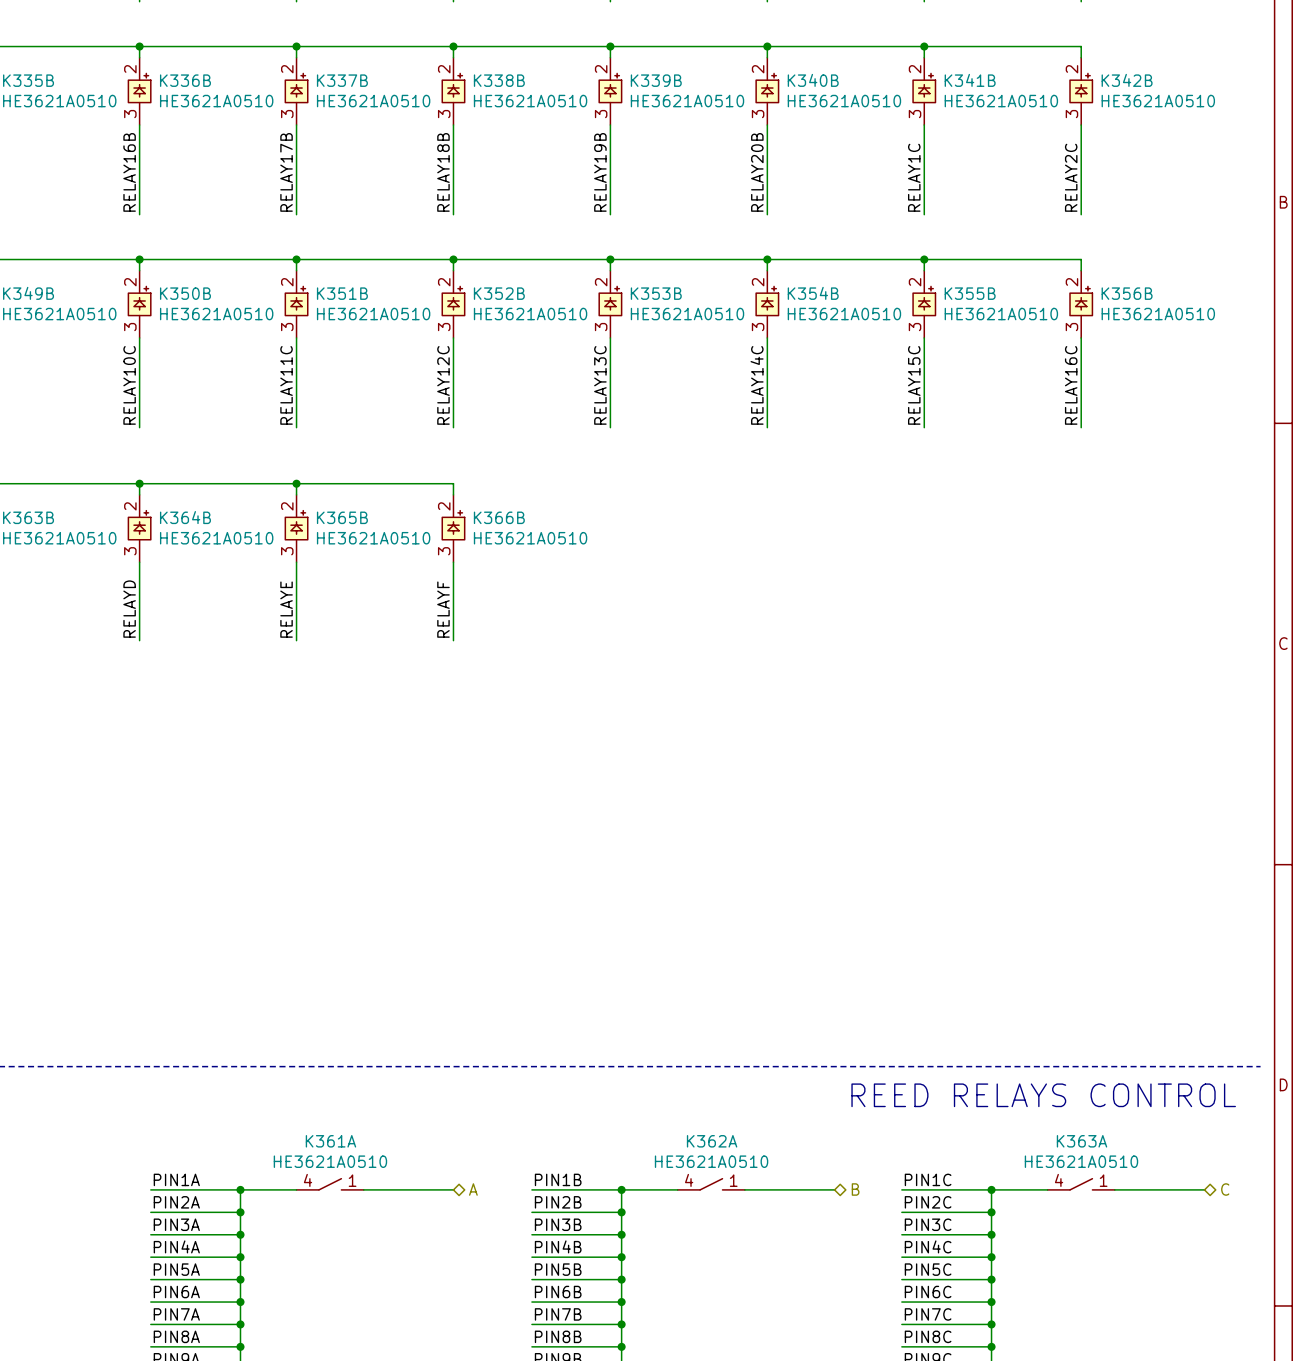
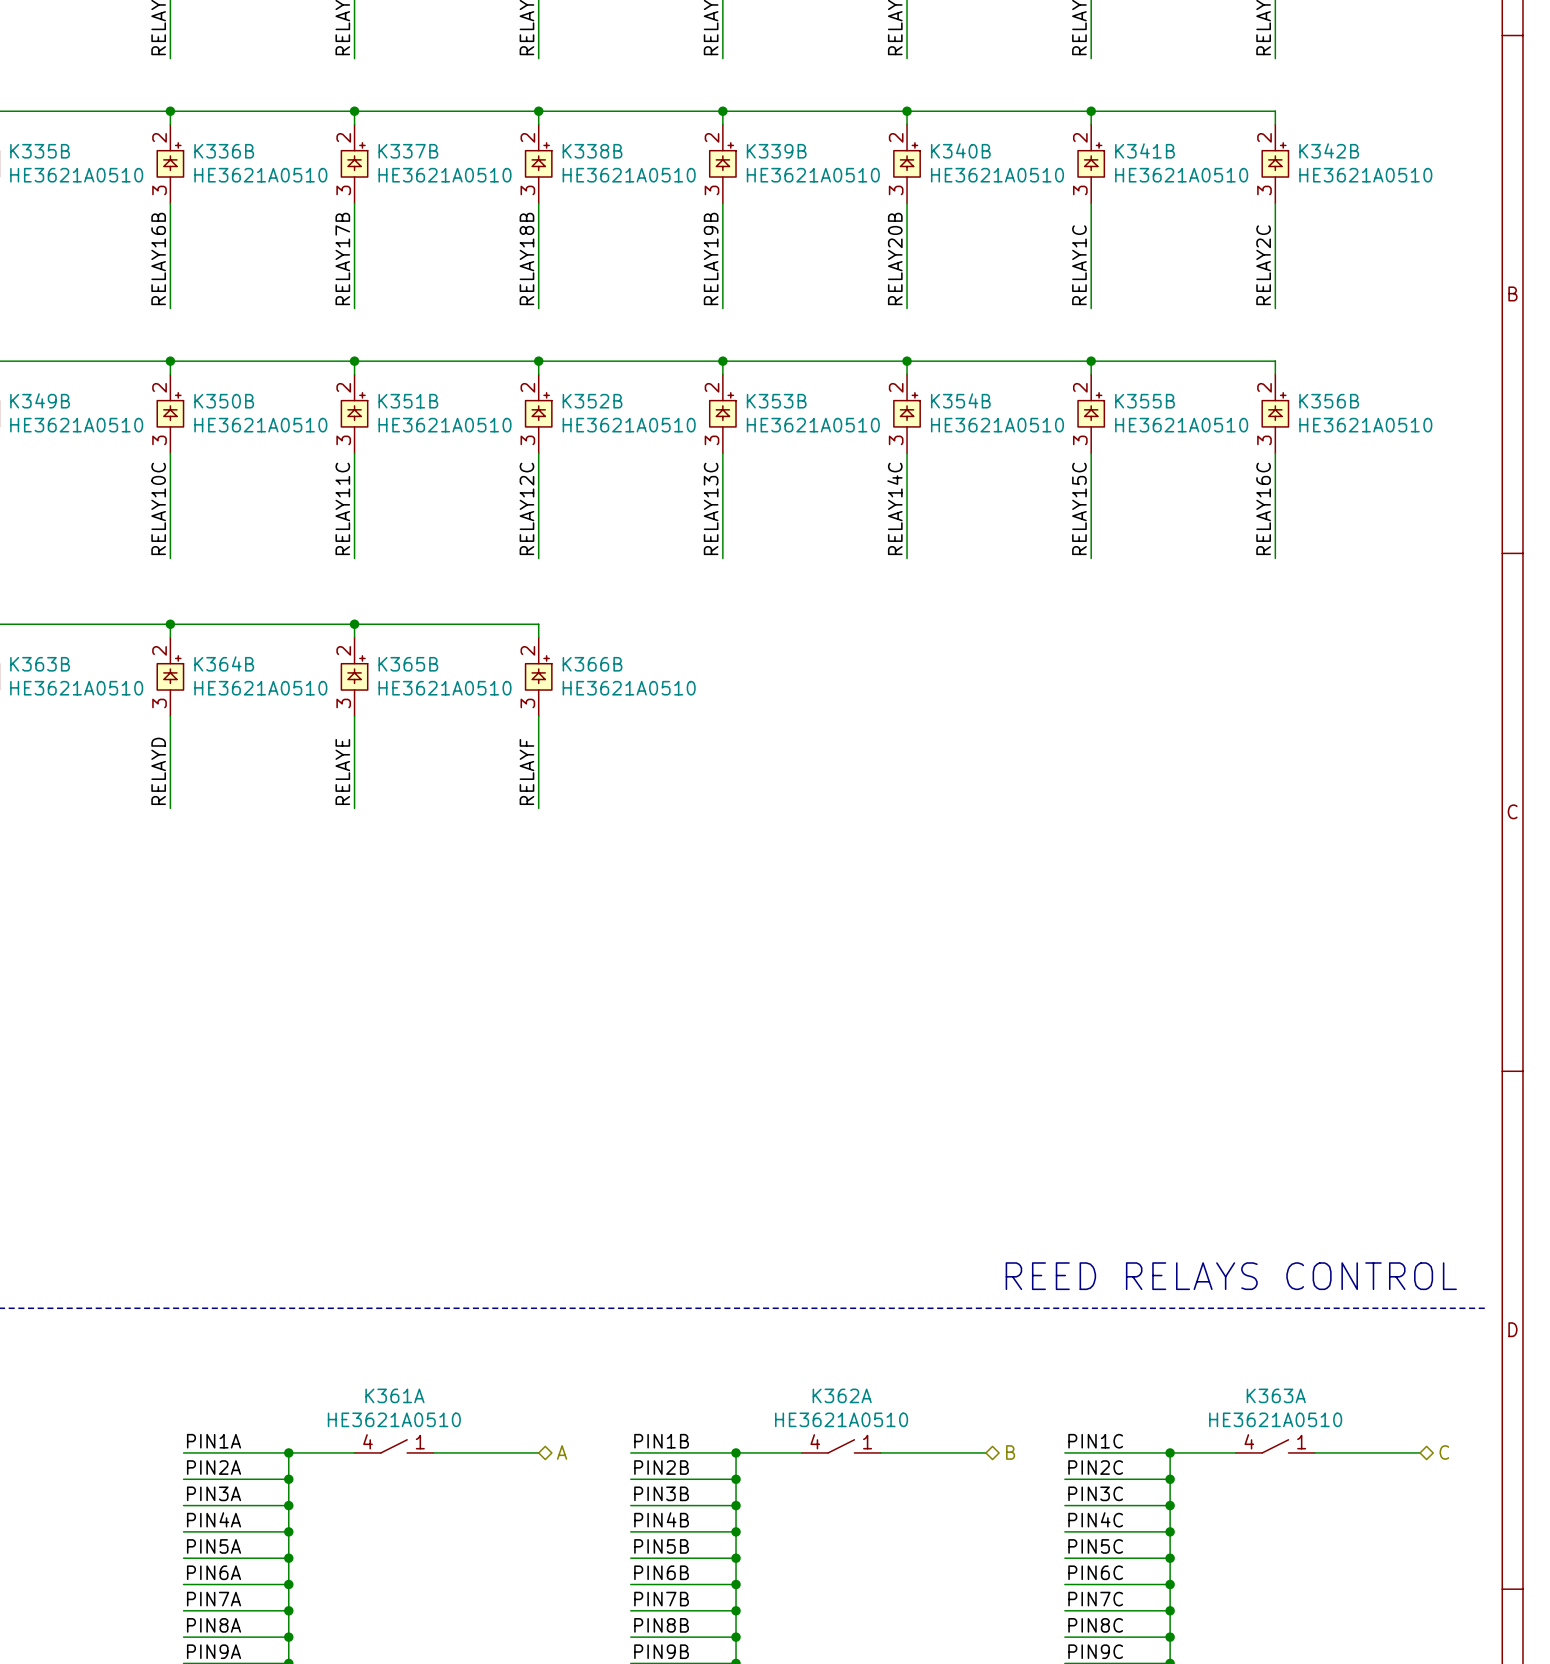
text position: REED RELAYS CONTROL (1043, 1095) -> REED RELAYS CONTROL (1231, 1276)

